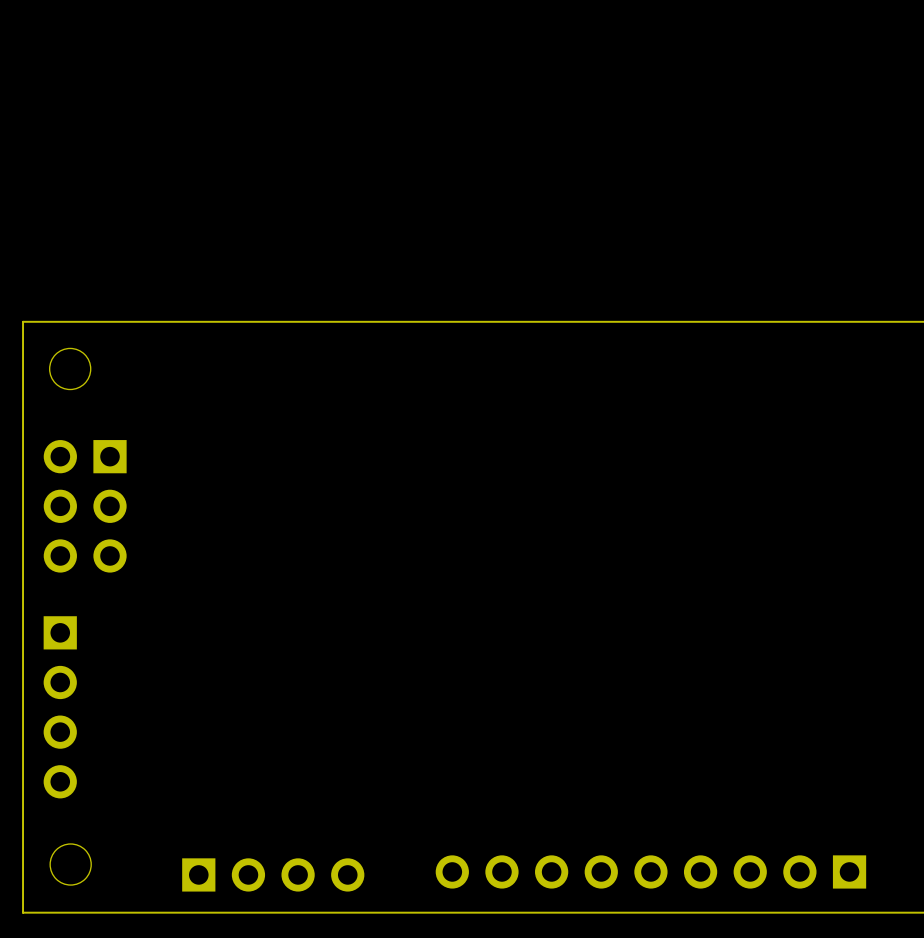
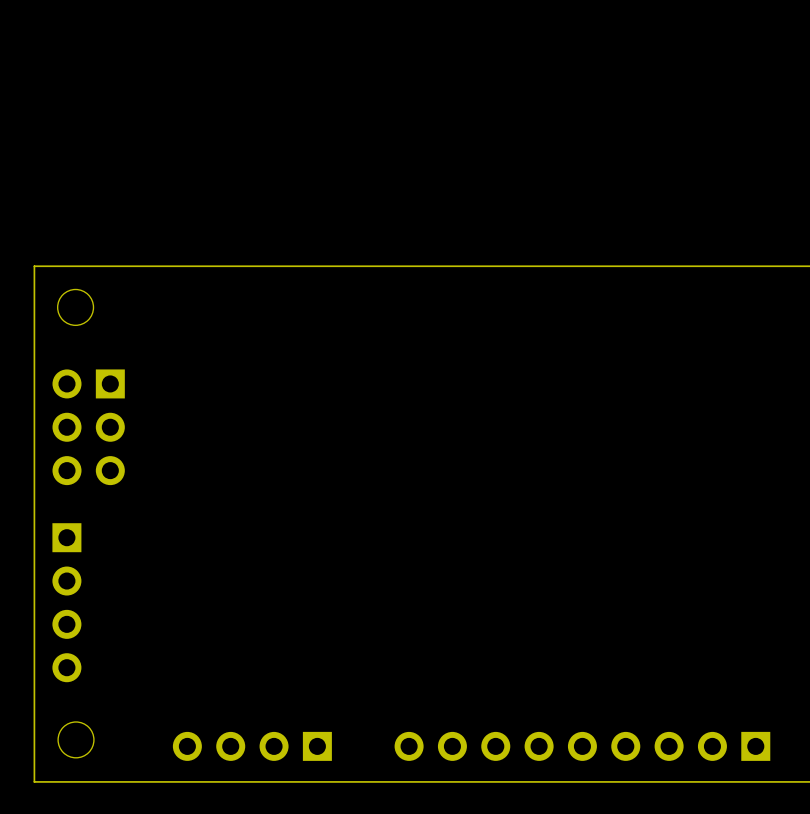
part rotation: 0° (273, 874) -> 180° (252, 746)

